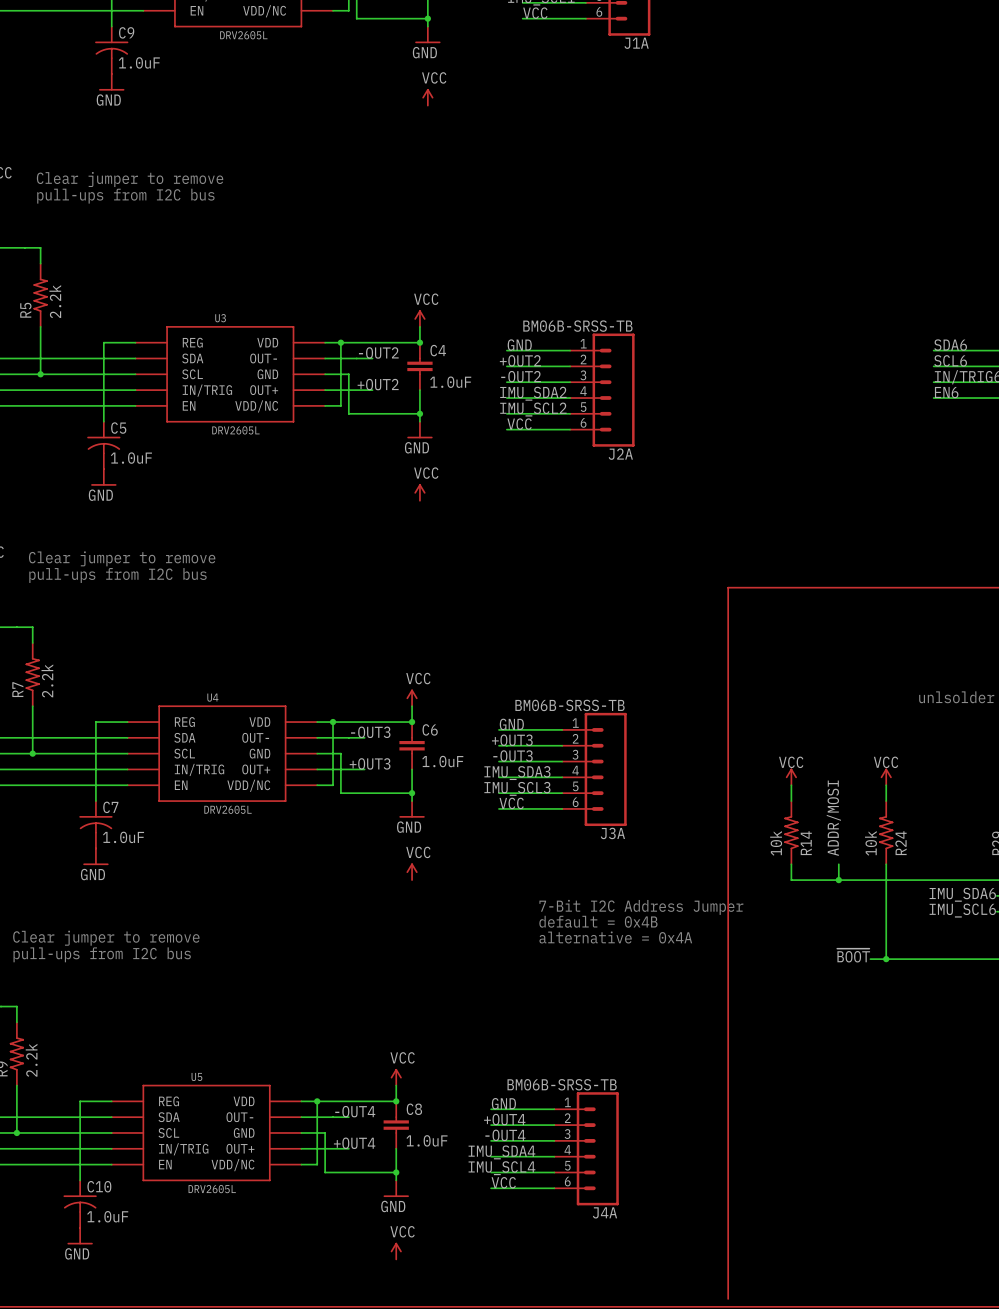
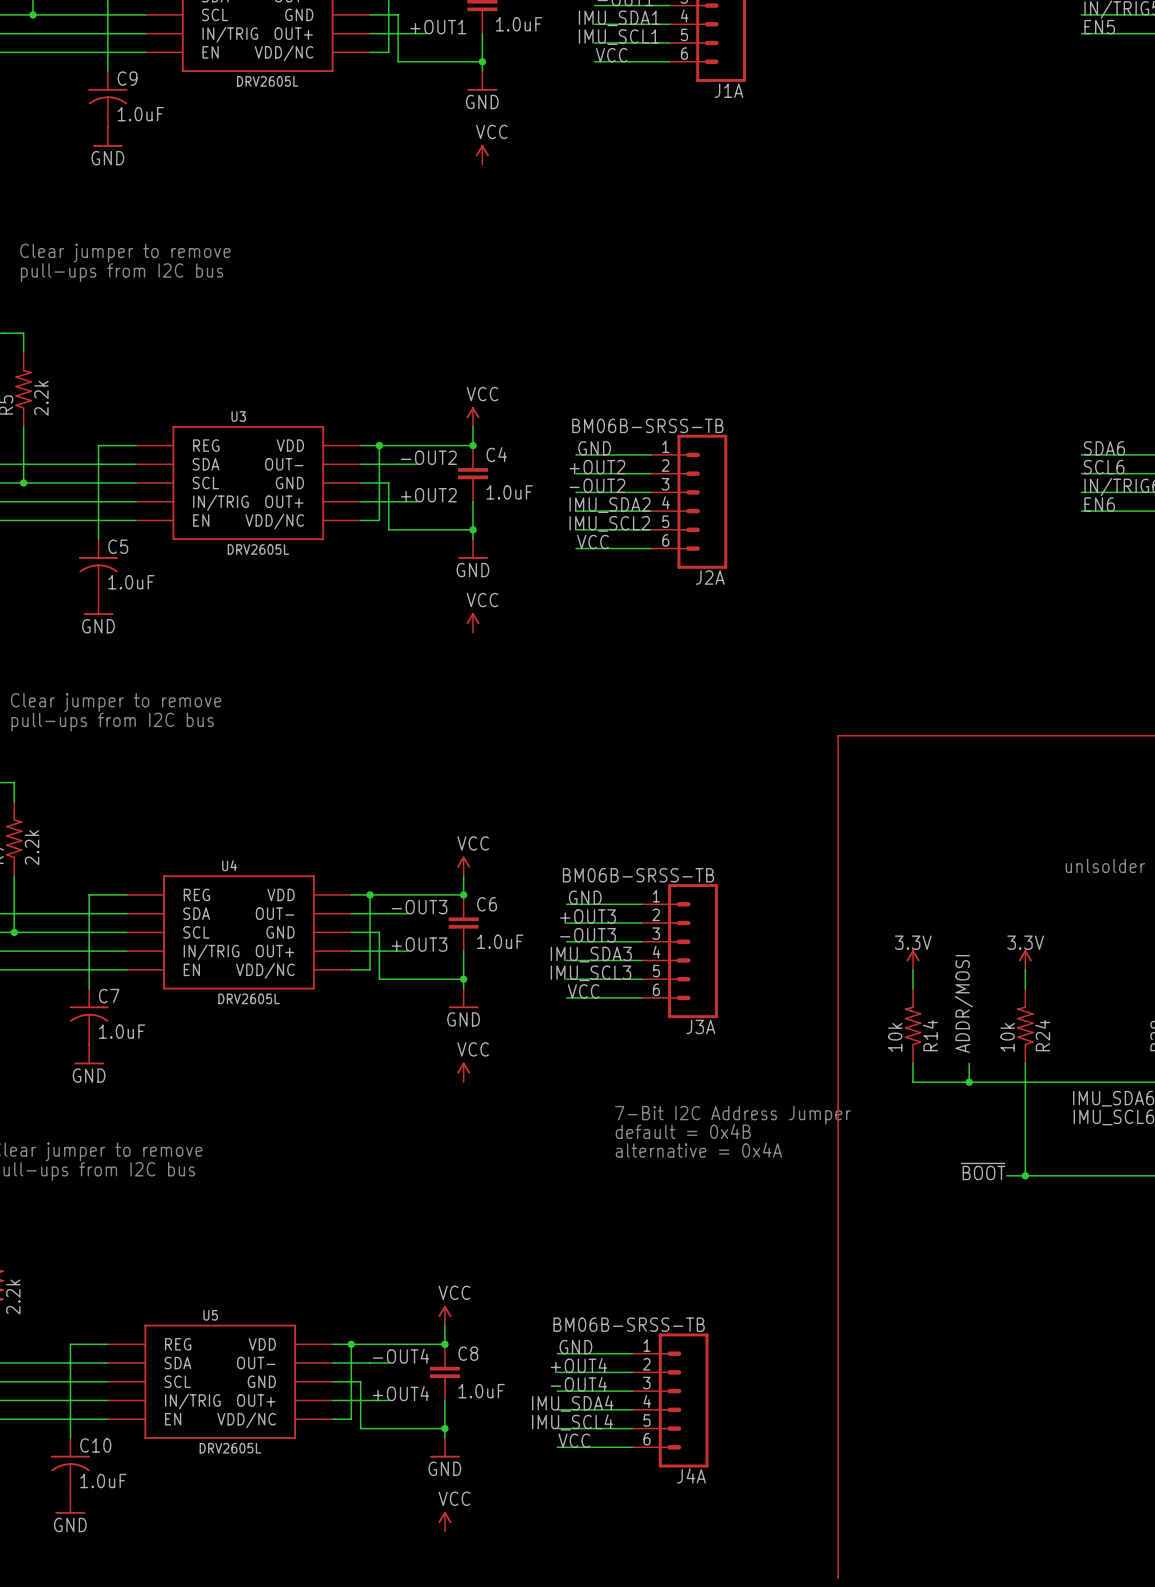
power symbol: VCC (791, 776) -> 3.3V (913, 960)
power symbol: VCC (886, 776) -> 3.3V (1025, 960)

